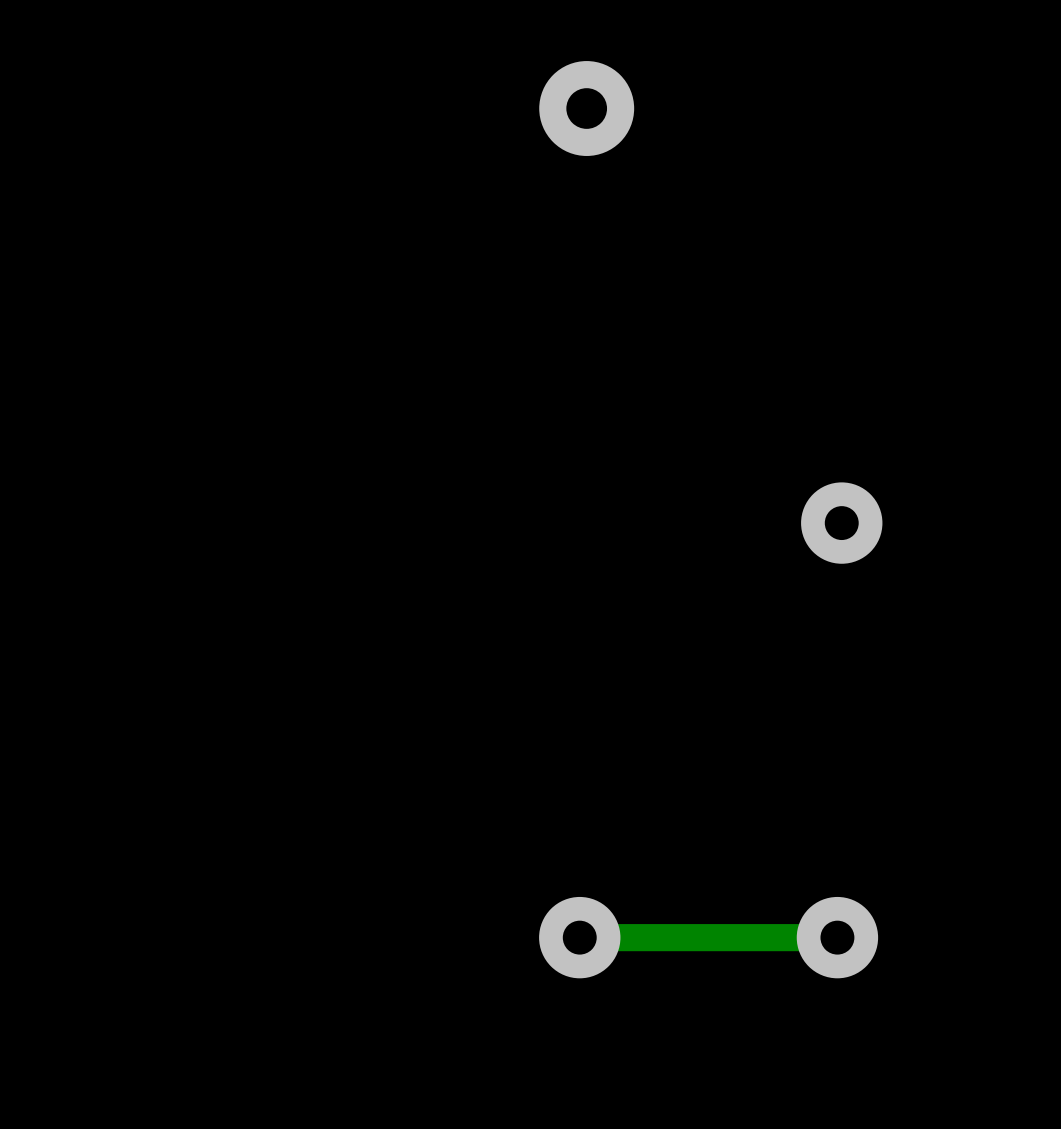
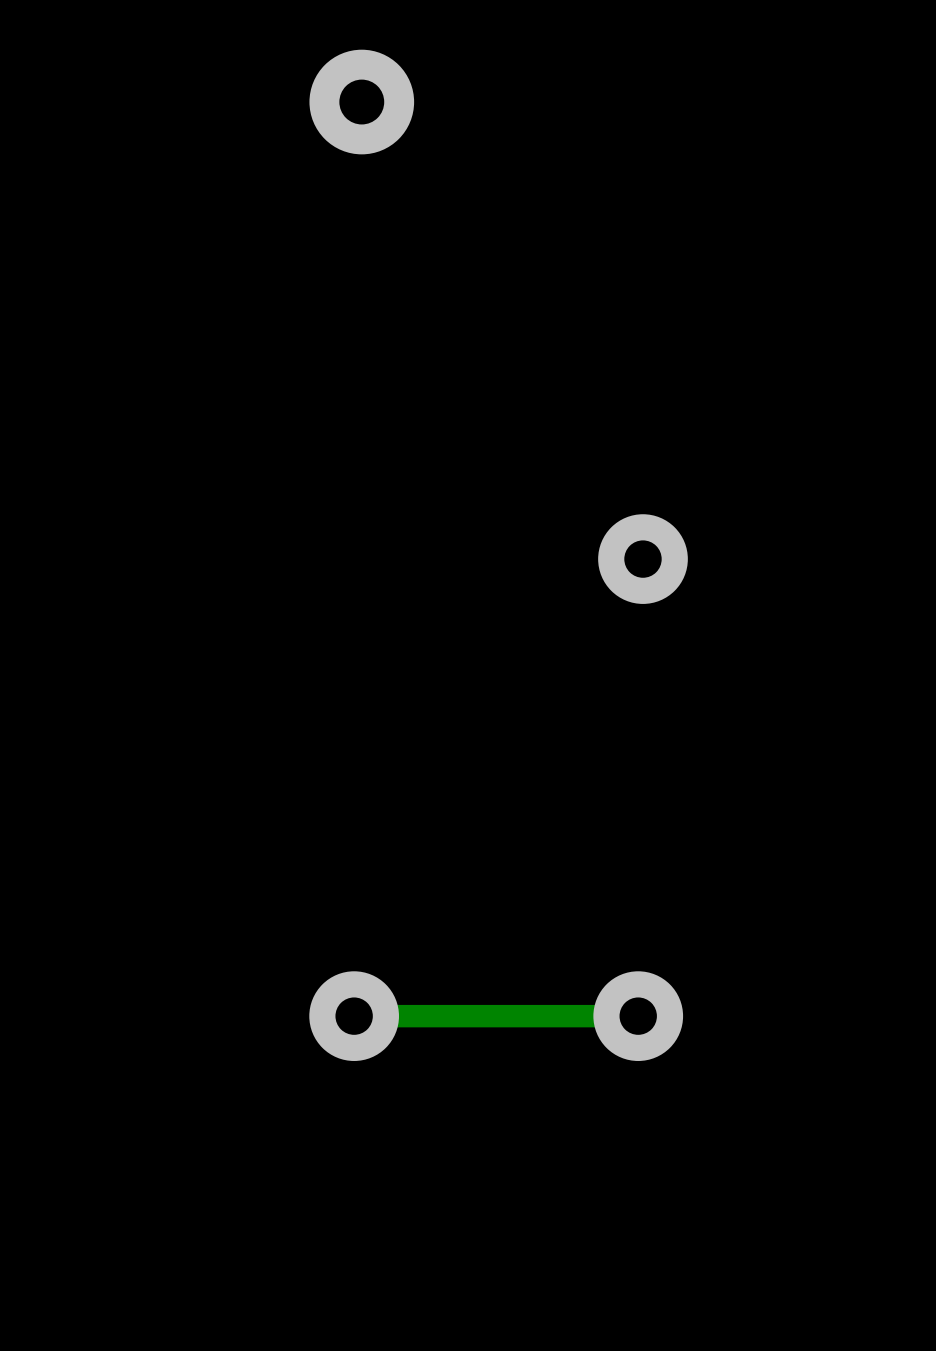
track width: thick (837, 937) (579, 937) -> thin (638, 1016) (354, 1016)

